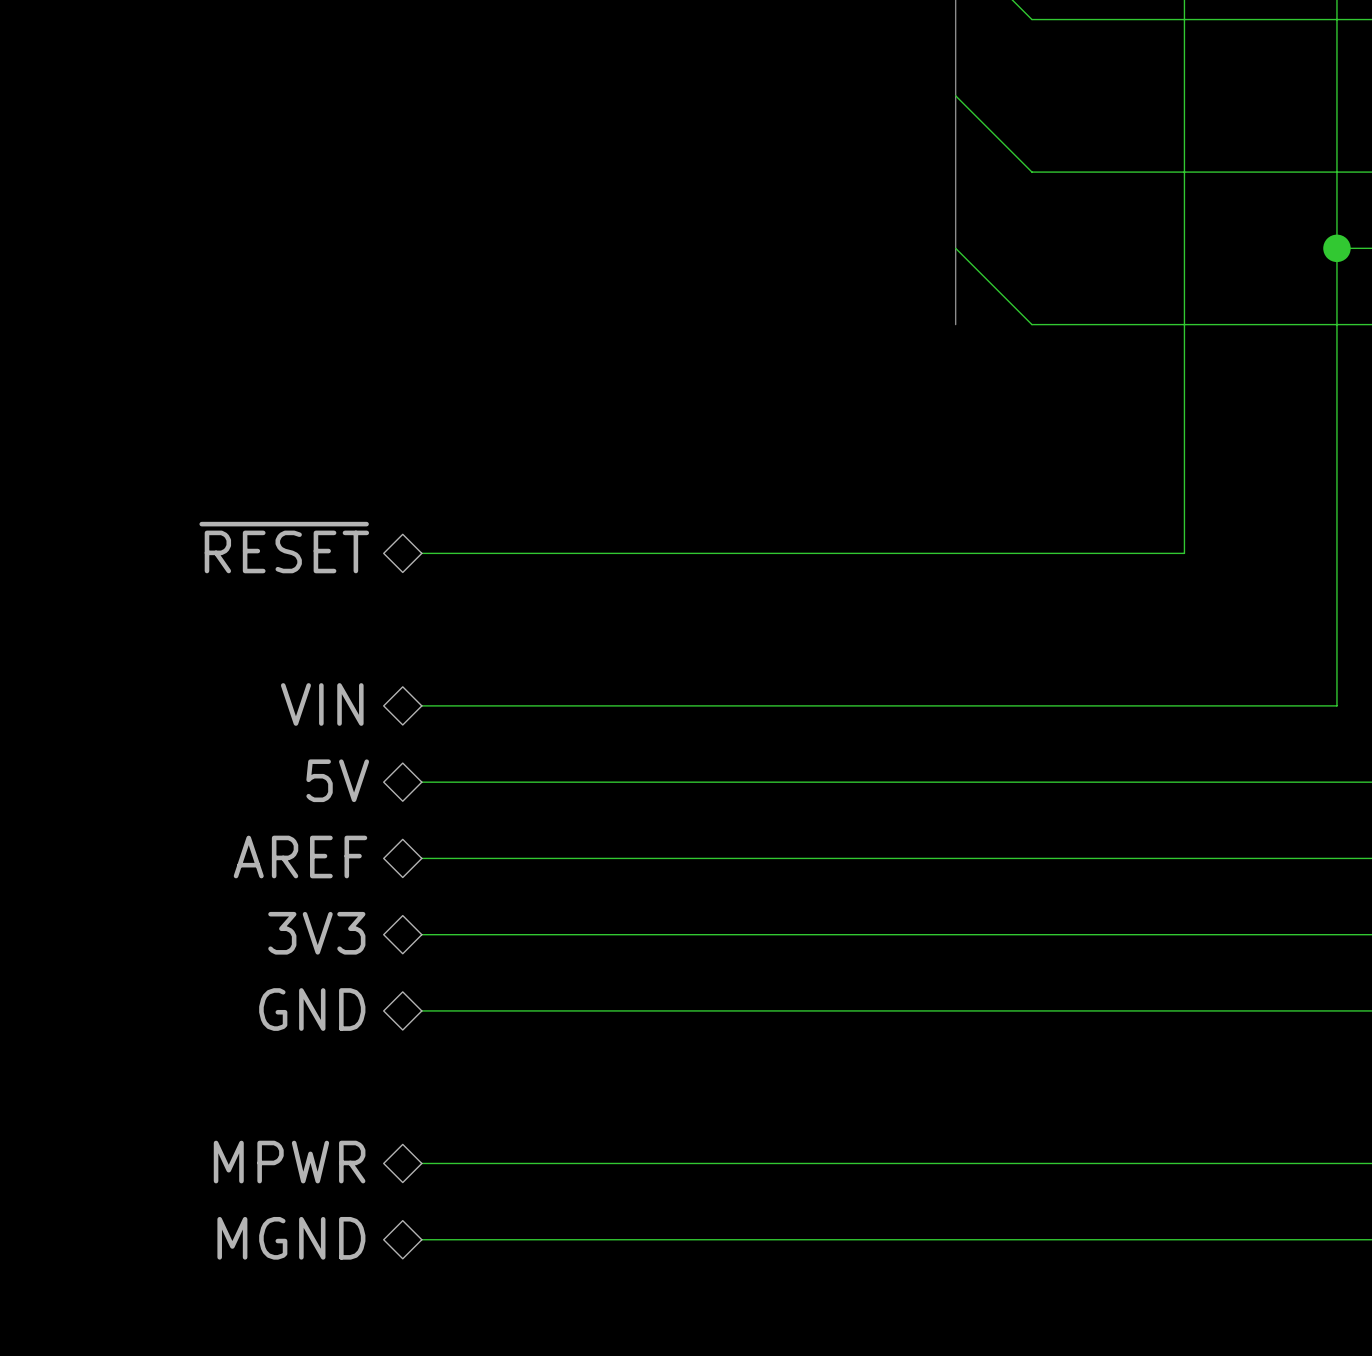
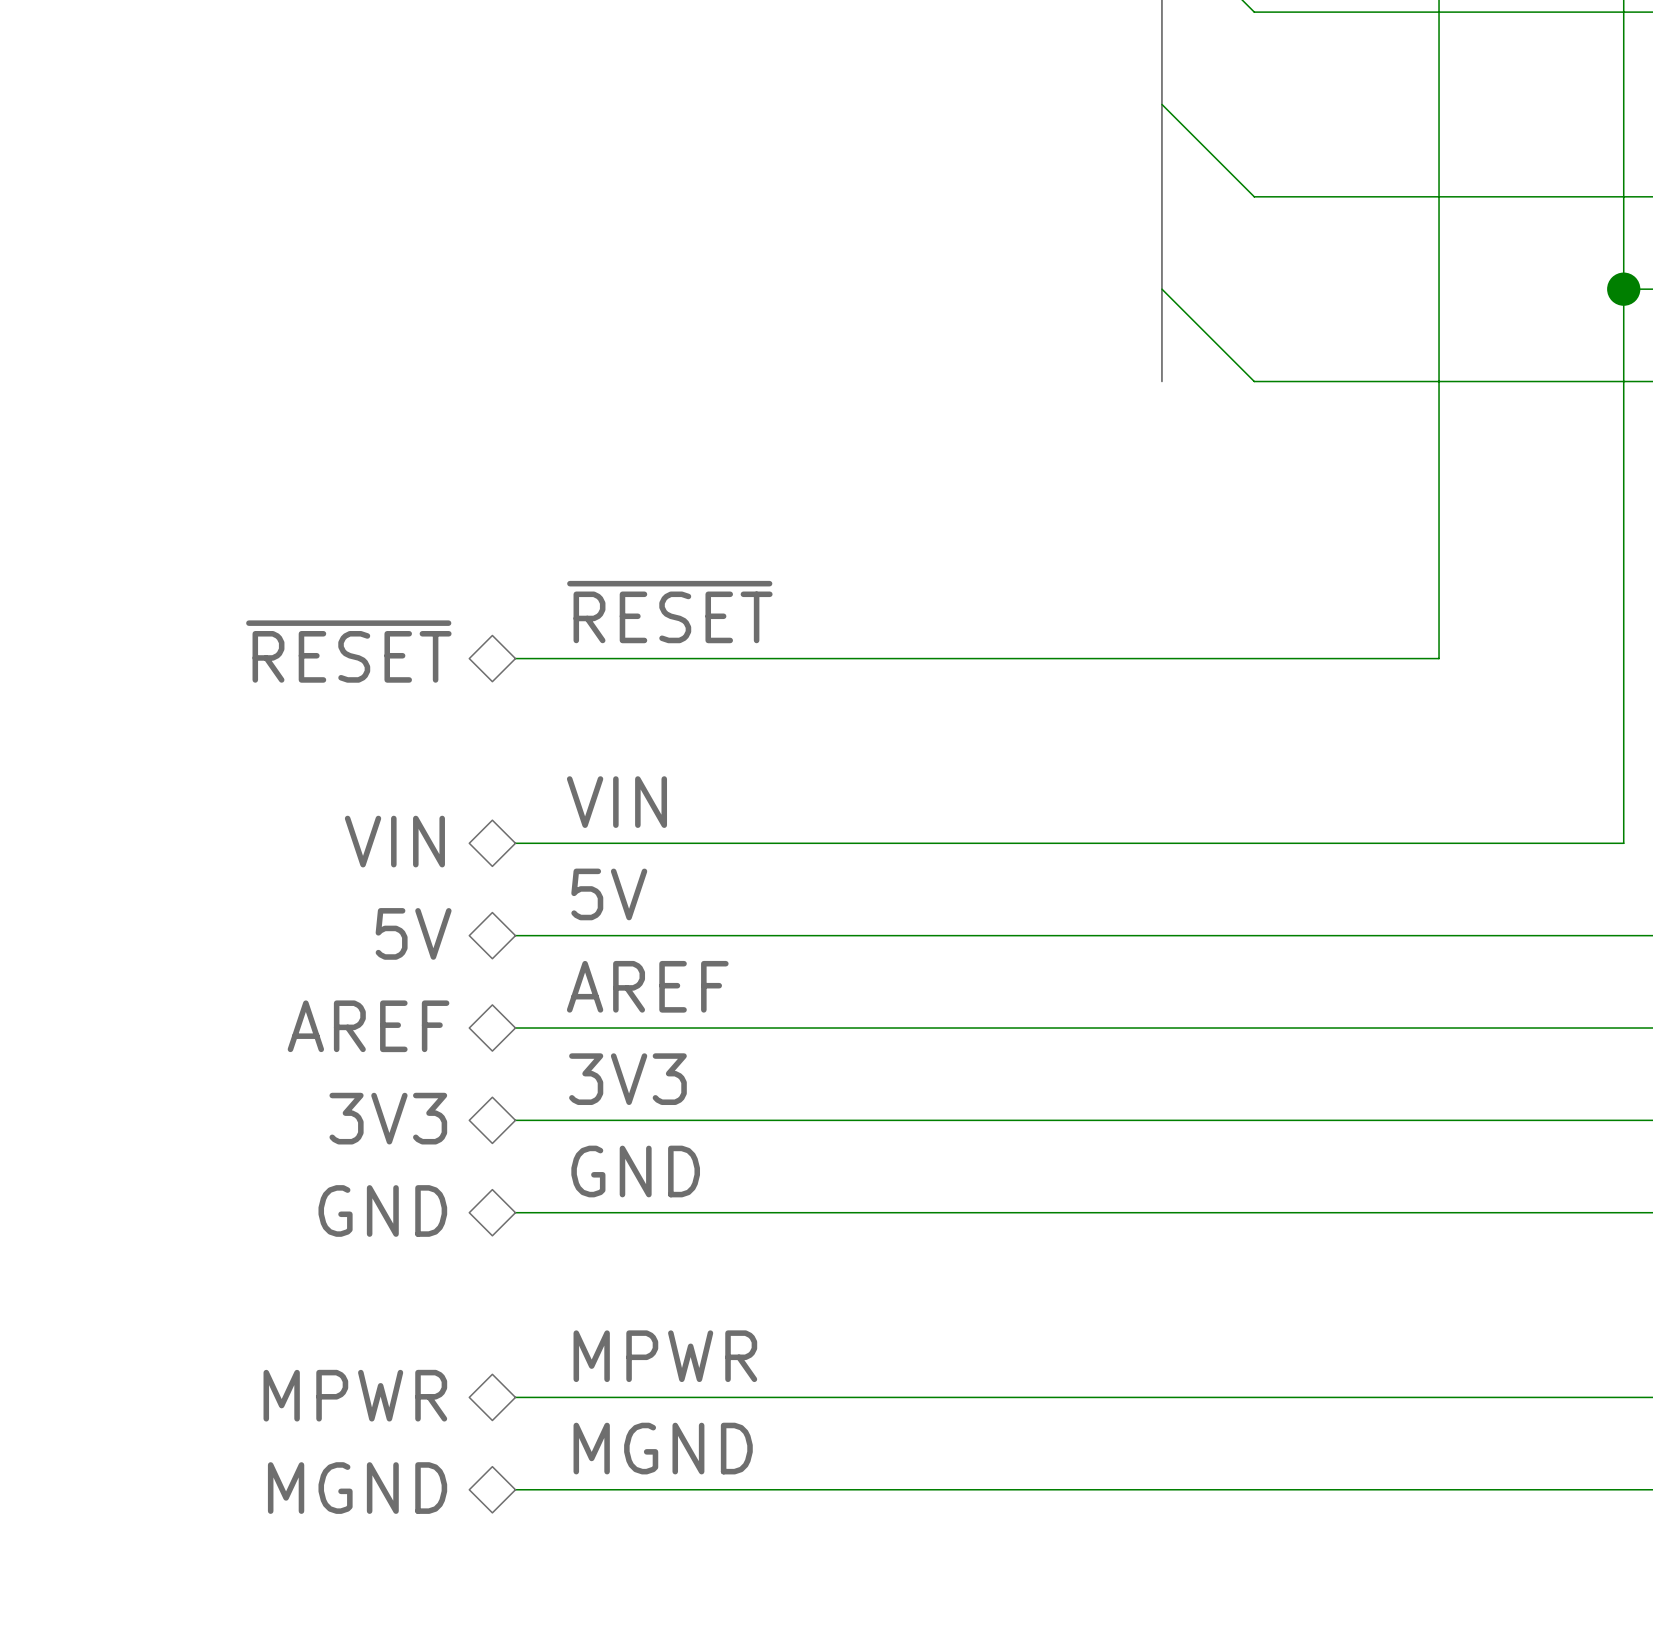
label: none -> ~{RESET} (669, 612)
label: none -> VIN (616, 802)
label: none -> 5V (609, 894)
label: none -> AREF (647, 986)
label: none -> 3V3 (627, 1079)
label: none -> GND (635, 1171)
label: none -> MPWR (665, 1356)
label: none -> MGND (663, 1448)

